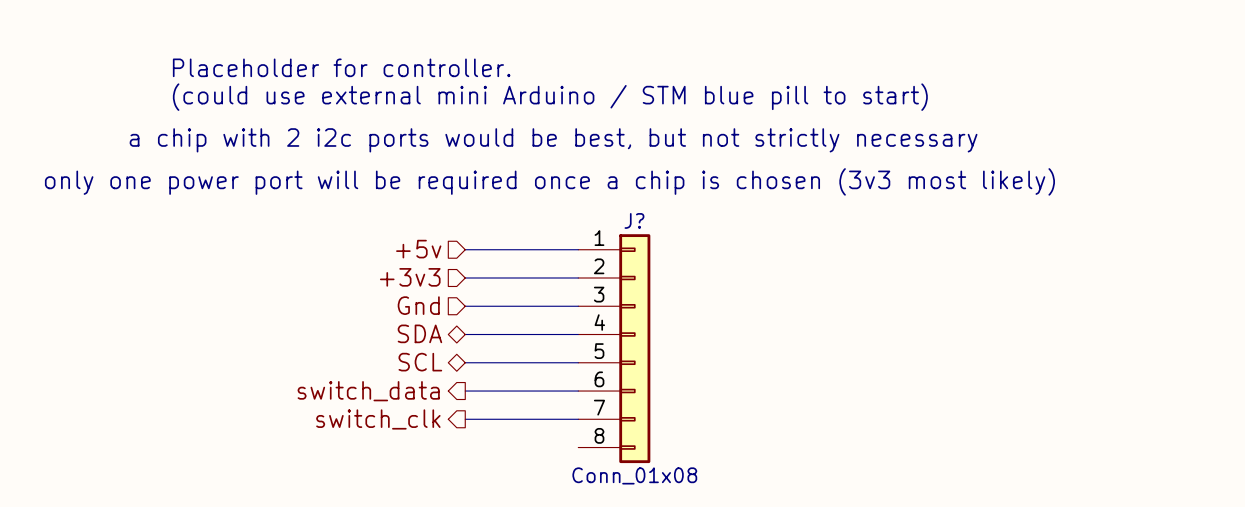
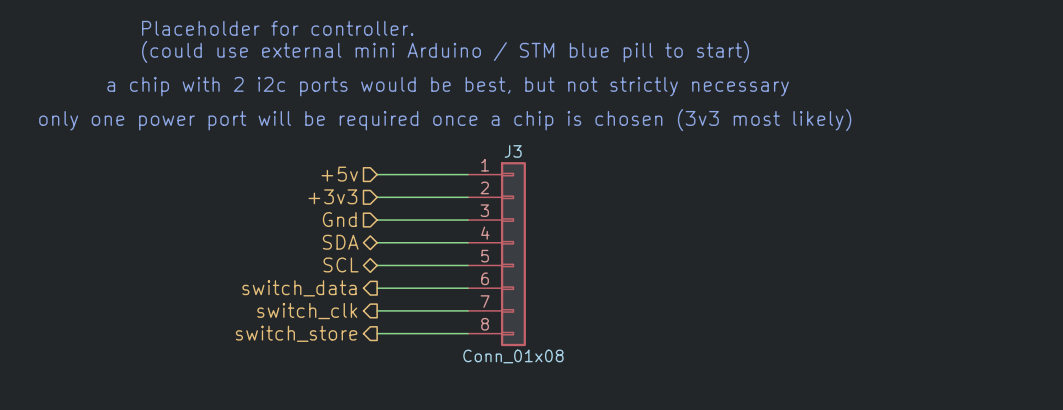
J? name: J? (634, 220) -> J3 (513, 151)
hierarchical label: none -> switch_store (296, 333)
wire: none -> (377, 333) (468, 333)

